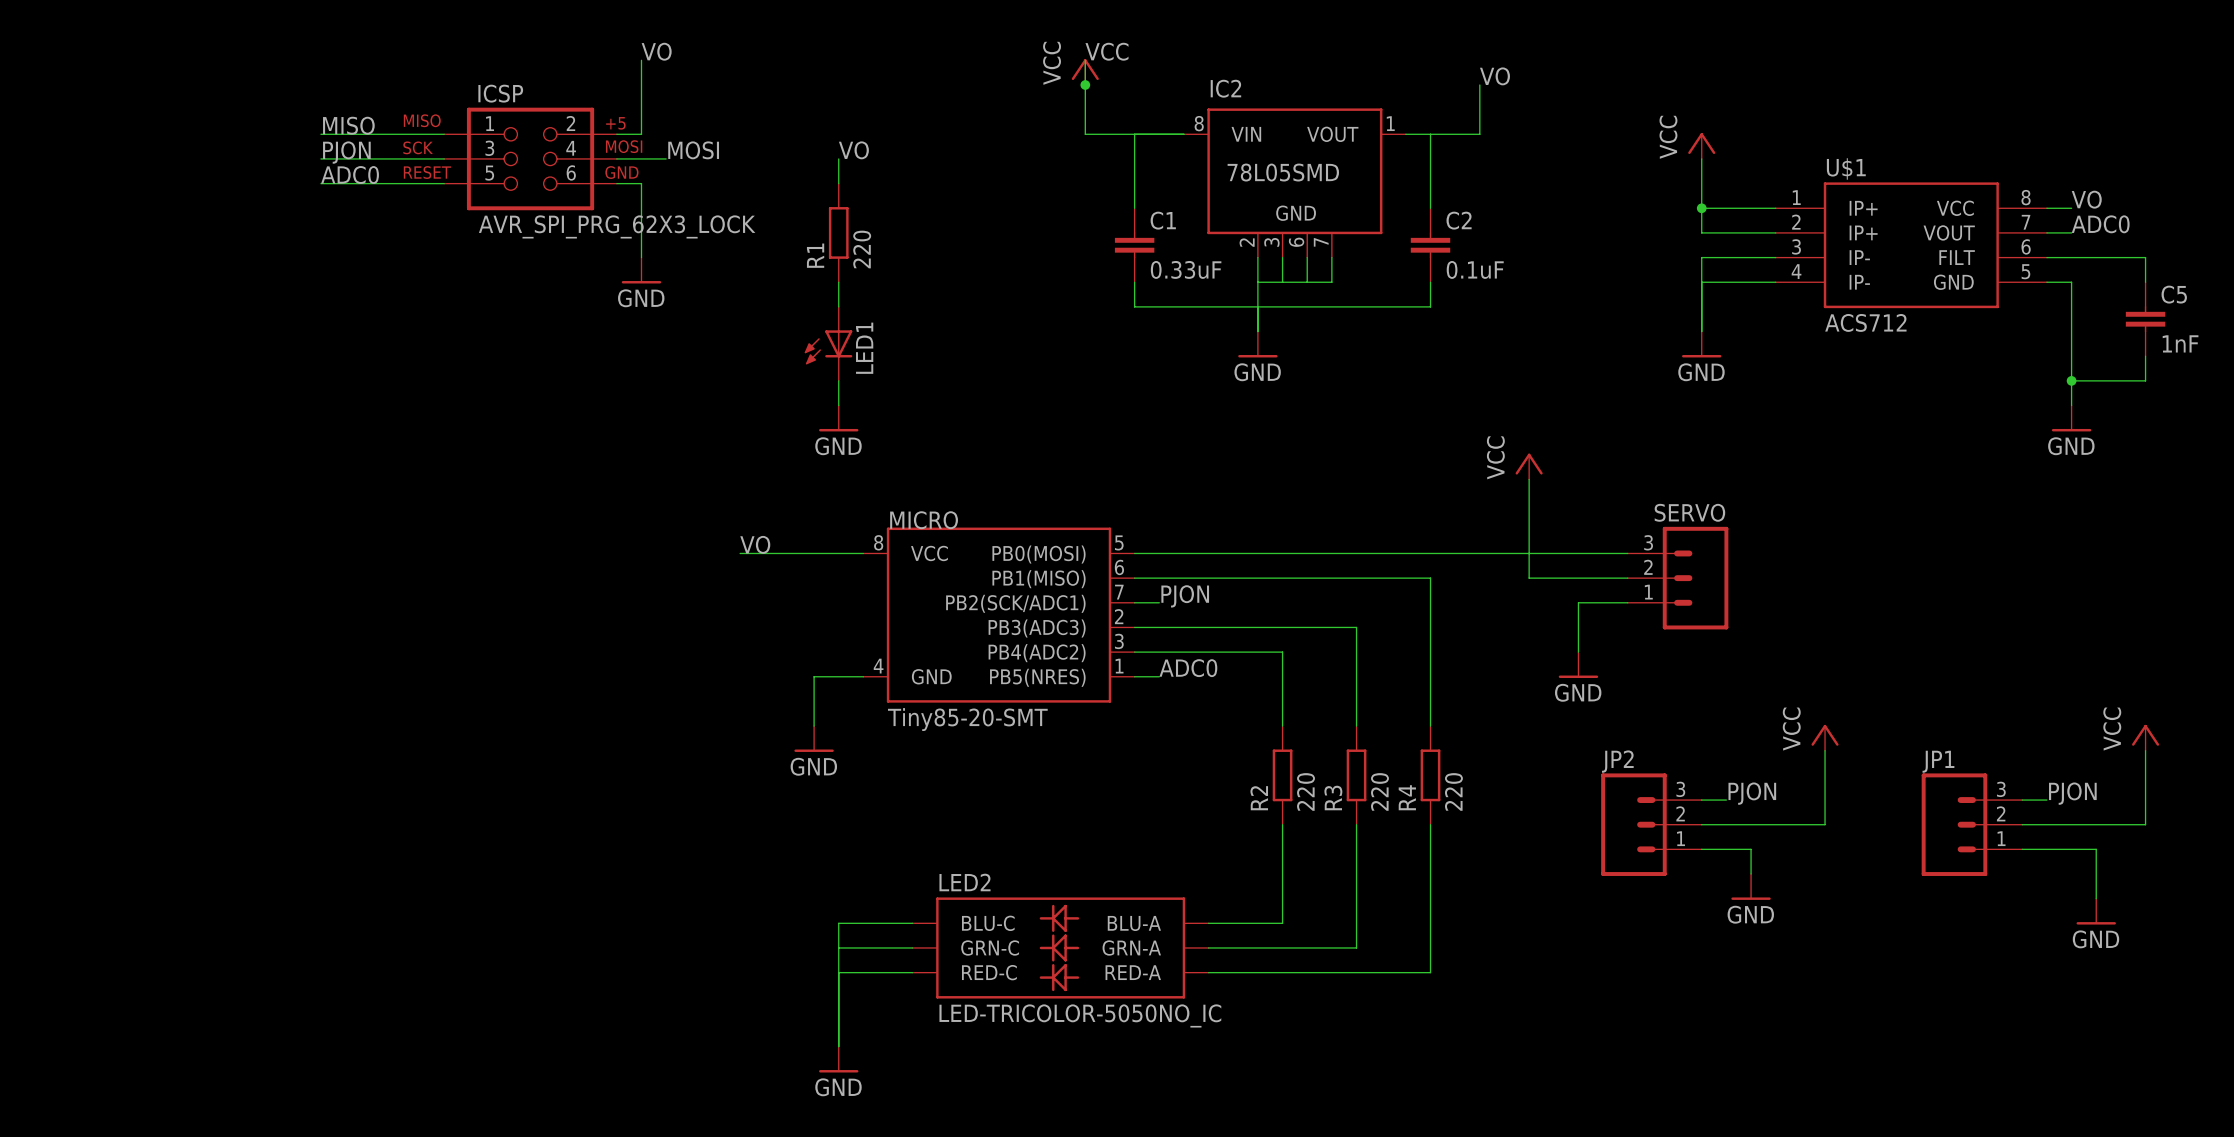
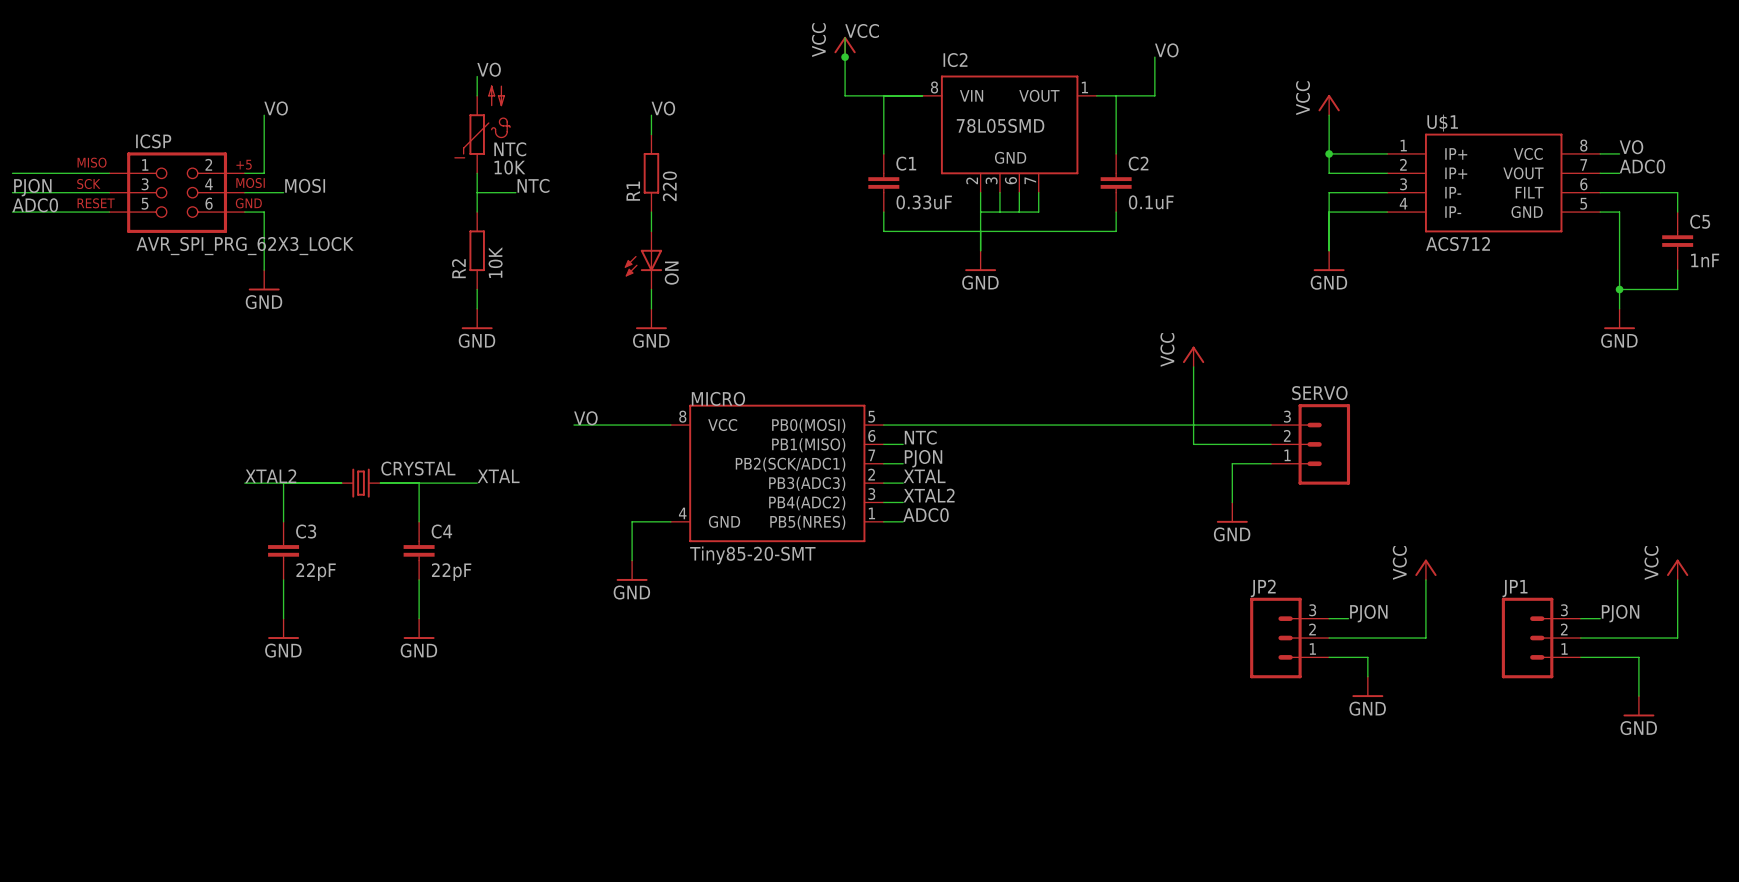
label position: VO (656, 51) -> VO (489, 69)
wire: (641, 60) (641, 134) (616, 134) -> (477, 76) (477, 95)
label: MISO (348, 125) -> none
wire: (320, 134) (444, 134) -> none
label: none -> VO (276, 108)
label: MOSI (693, 150) -> none
label: PJON (346, 152) -> none
wire: (320, 158) (444, 158) -> none
wire: none -> (264, 115) (264, 173) (244, 173)
ICSP: AVR_SPI_PRG_62X3_LOCK (530, 158) -> none
wire: (616, 158) (666, 158) -> (477, 192) (515, 192)
label: ADC0 (350, 175) -> none
NTC: none -> 10K (482, 129)
wire: (320, 183) (444, 183) -> none
wire: (616, 183) (641, 183) (641, 257) -> none
wire: none -> (12, 173) (109, 173)
wire: none -> (477, 173) (477, 212)
label: none -> MOSI (305, 185)
label: none -> NTC (533, 185)
label: none -> PJON (32, 187)
wire: none -> (12, 192) (109, 192)
ICSP: none -> AVR_SPI_PRG_62X3_LOCK (177, 192)
wire: none -> (244, 192) (283, 192)
power symbol position: GND (641, 270) -> GND (477, 319)
label: none -> ADC0 (35, 205)
wire: none -> (12, 212) (109, 212)
wire: none -> (244, 212) (264, 212) (264, 270)
LED1 name: LED1 (864, 348) -> ON (671, 273)
power symbol: none -> GND (264, 280)
wire: none -> (477, 289) (477, 308)
label: none -> NTC (920, 437)
wire: (1159, 578) (1430, 578) (1430, 726) -> none
label: none -> XTAL2 (270, 476)
label: none -> XTAL (498, 476)
label: none -> XTAL (924, 476)
wire: none -> (244, 483) (341, 483)
wire: none -> (283, 483) (283, 521)
CRYSTAL: none -> (361, 483)
wire: none -> (380, 483) (477, 483)
wire: none -> (419, 483) (419, 521)
wire: (1159, 627) (1356, 627) (1356, 726) -> none
label: none -> XTAL2 (929, 495)
wire: (1159, 652) (1282, 652) (1282, 726) -> none
C3: none -> 22pF (283, 550)
C4: none -> 22pF (419, 550)
wire: none -> (283, 579) (283, 618)
wire: none -> (419, 579) (419, 618)
R2 position: (1282, 775) -> (477, 250)
R3: 220 (1356, 775) -> none
R4: 220 (1430, 775) -> none
R2 value: 220 (1306, 791) -> 10K (495, 262)
power symbol: none -> GND (283, 628)
power symbol: none -> GND (419, 628)
wire: (1282, 824) (1282, 923) (1208, 923) -> none
wire: (1356, 824) (1356, 947) (1208, 947) -> none
wire: (1430, 824) (1430, 972) (1208, 972) -> none
wire: (912, 923) (838, 923) (838, 1046) -> none
wire: (838, 947) (912, 947) -> none
LED2: LED-TRICOLOR-5050NO_IC (1060, 947) -> none
wire: (838, 972) (912, 972) -> none
power symbol: GND (838, 1059) -> none

